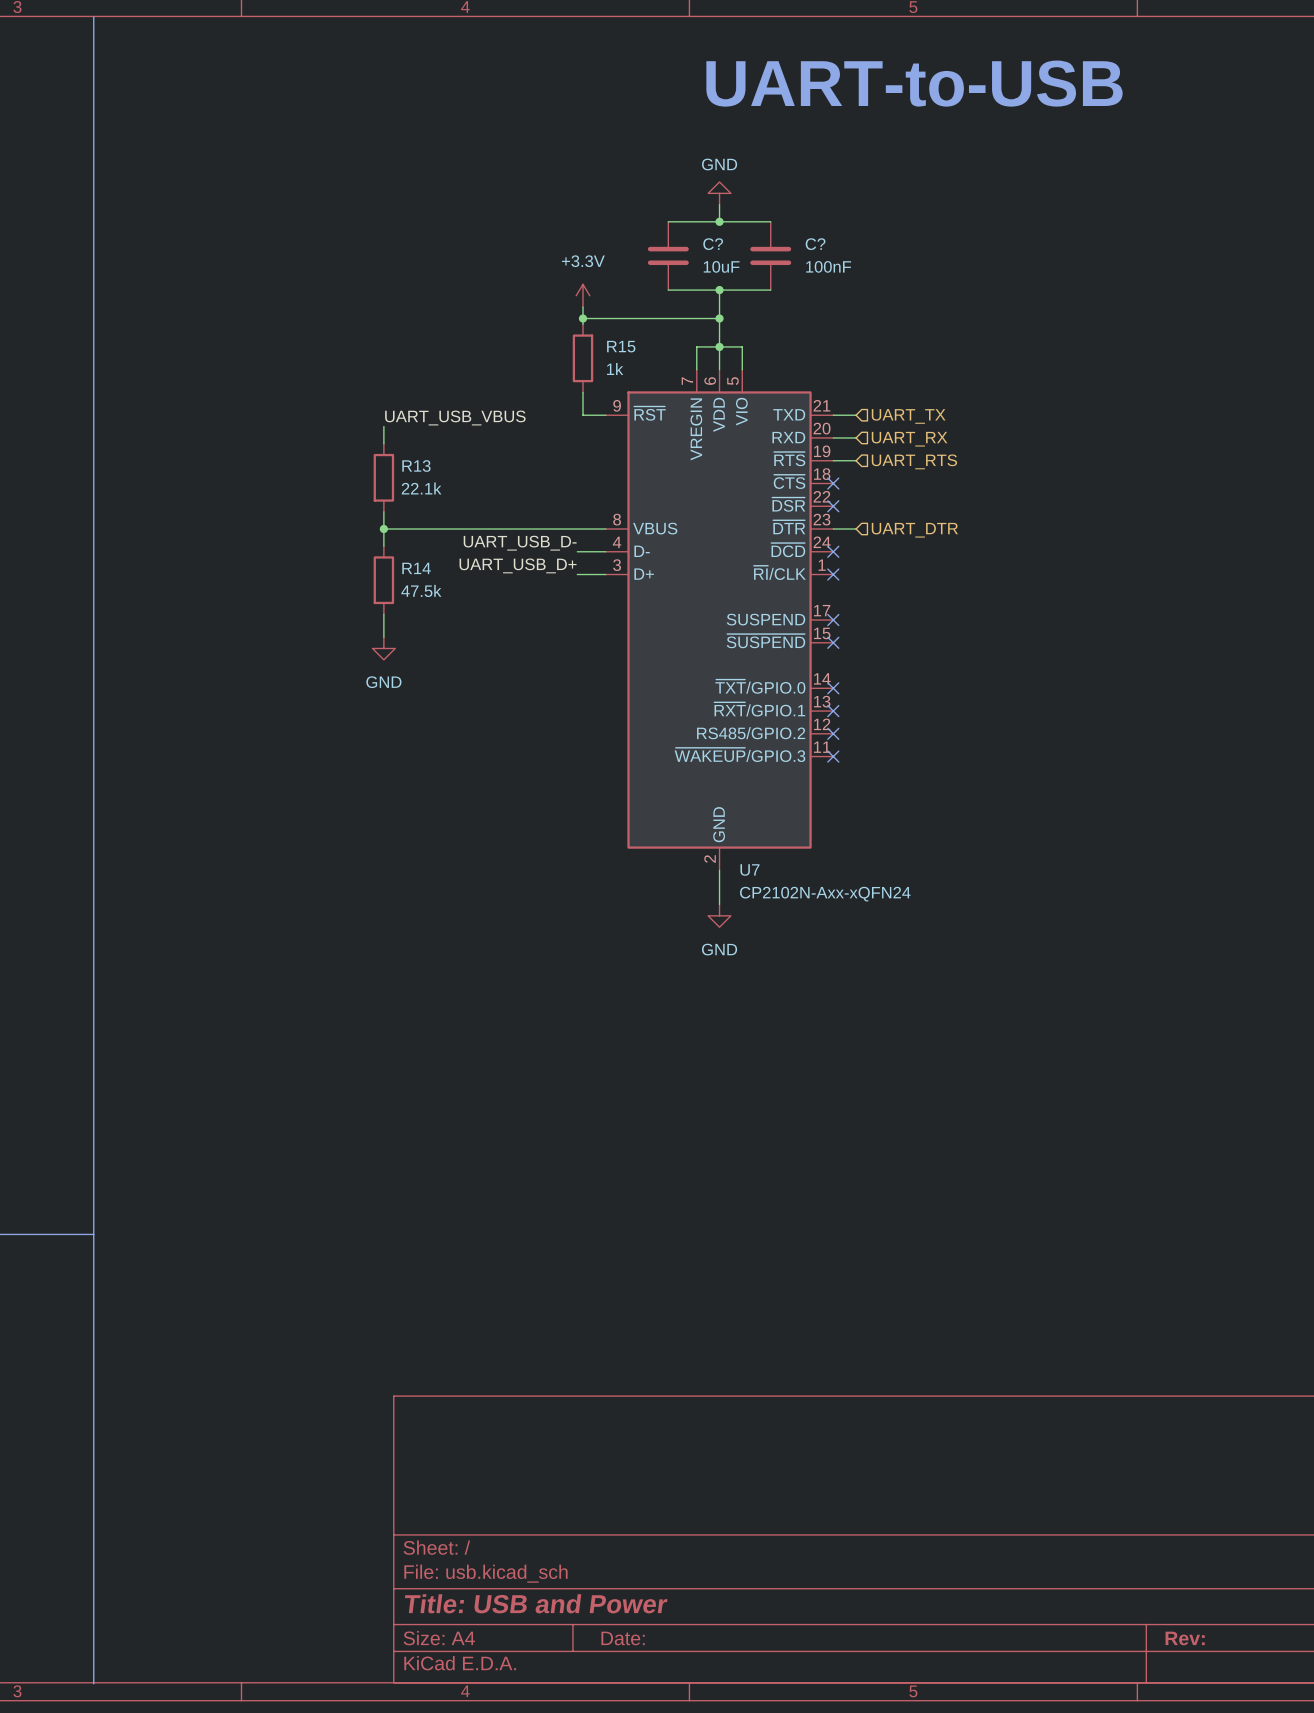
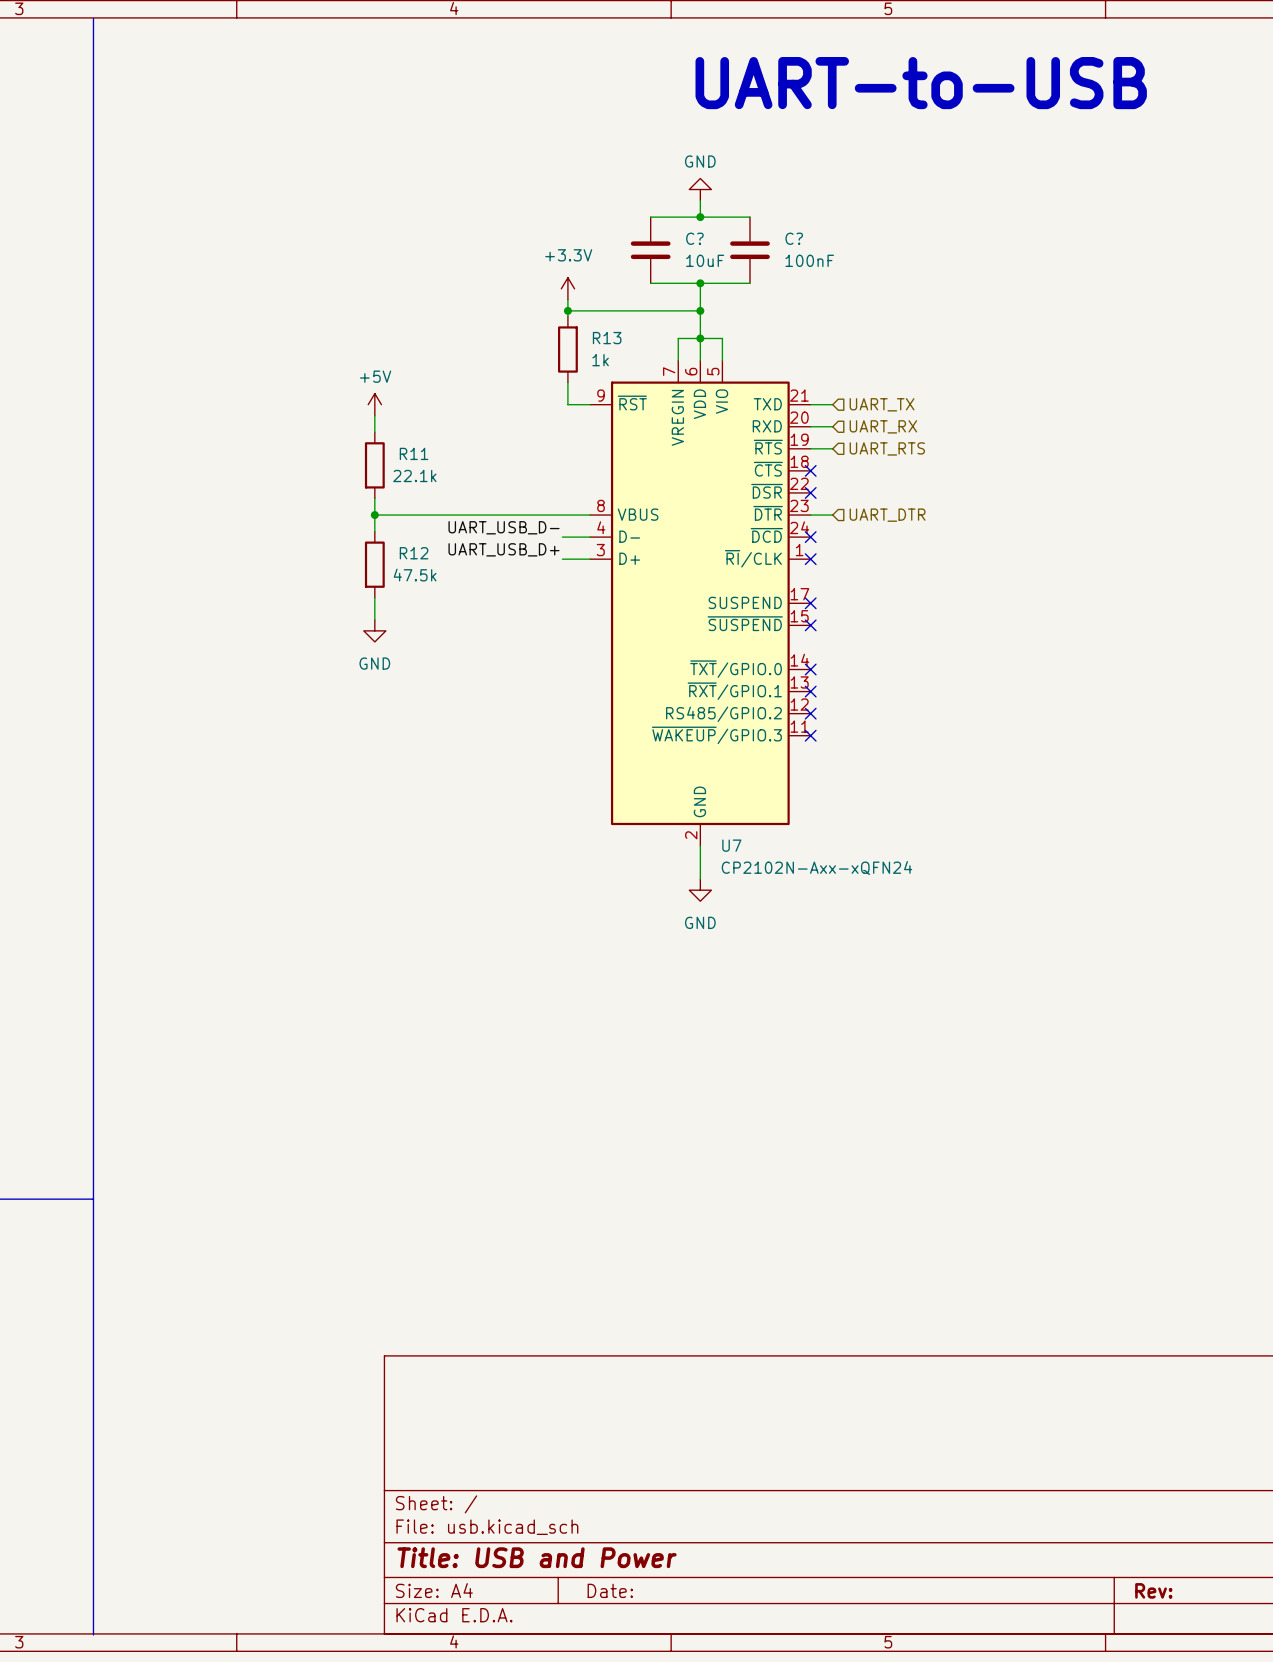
R15 name: R15 (621, 346) -> R13 (607, 338)
power symbol: none -> +5V (374, 404)
label: UART_USB_VBUS (455, 418) -> none
R13 name: R13 (416, 466) -> R11 (414, 453)
R14 name: R14 (416, 568) -> R12 (414, 553)

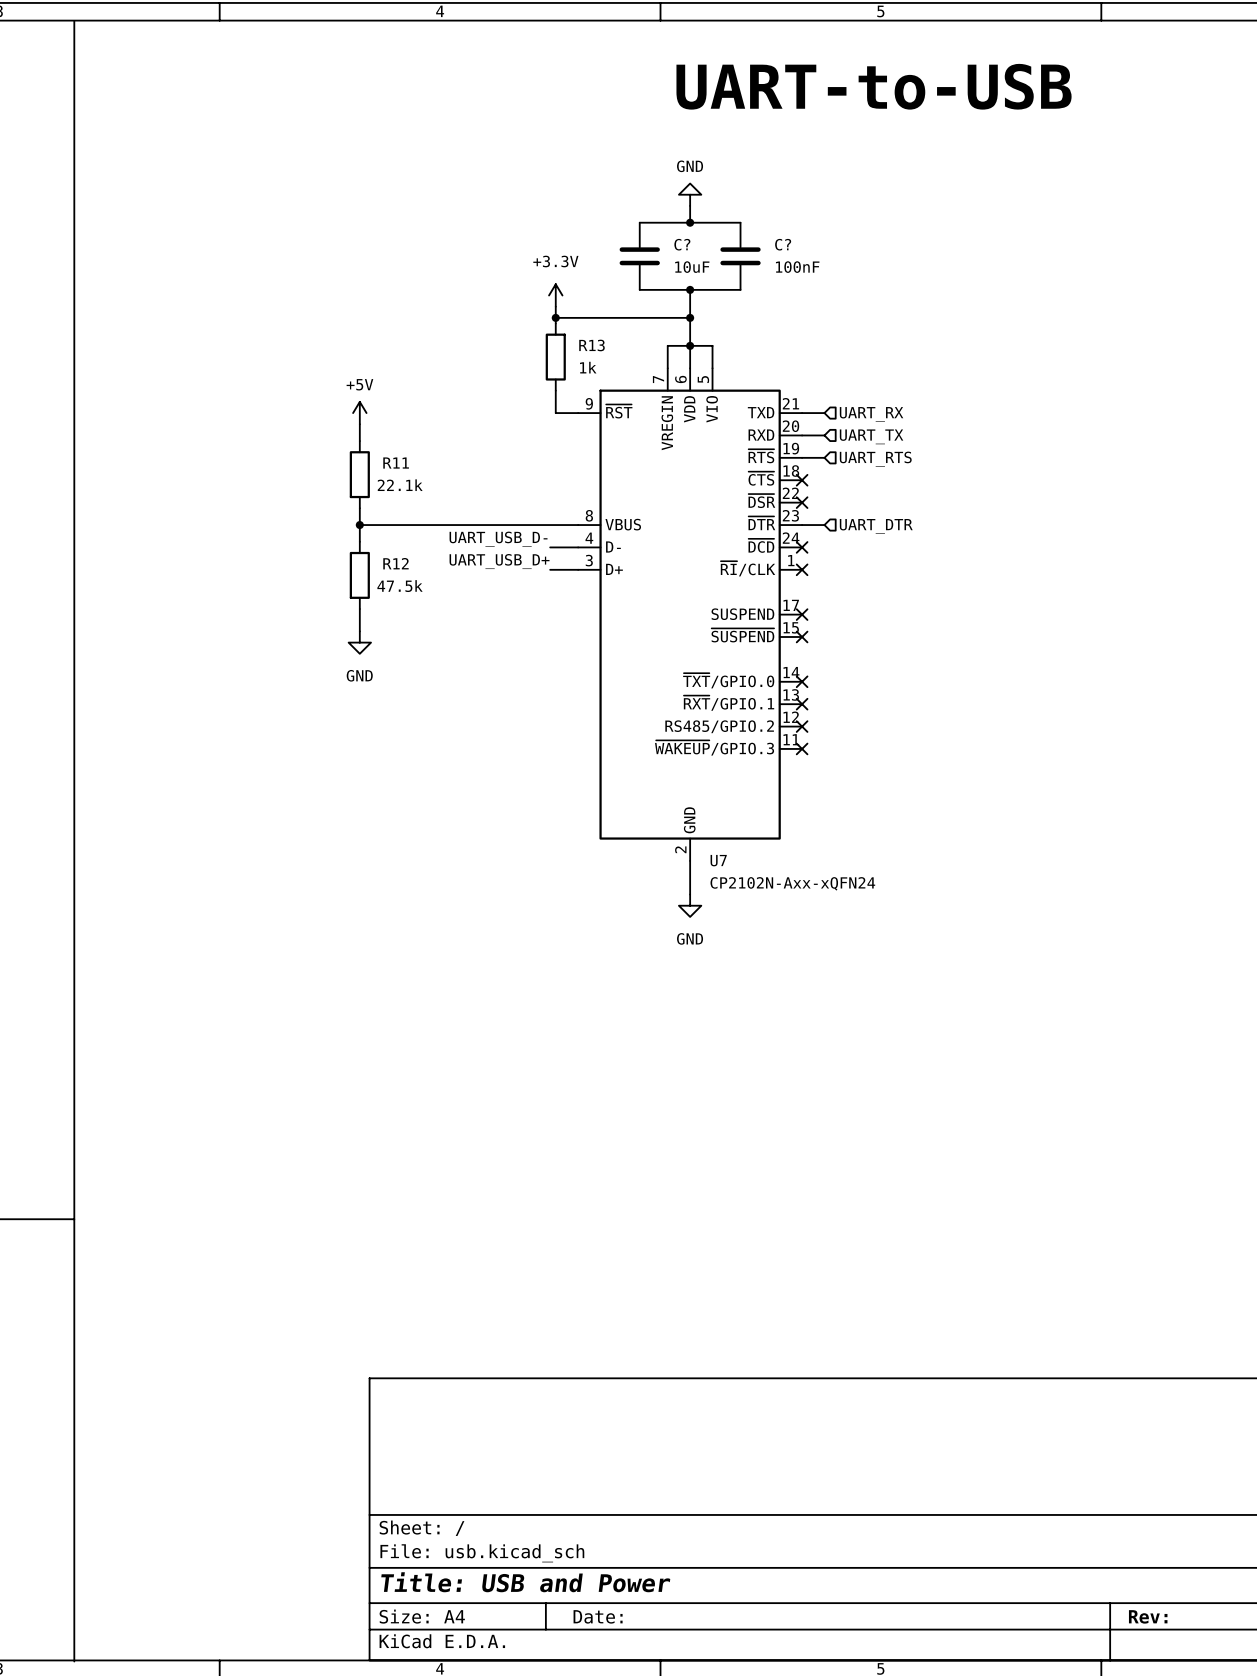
hierarchical label: UART_TX (882, 404) -> UART_RX (871, 414)
hierarchical label: UART_RX (883, 426) -> UART_TX (871, 436)

